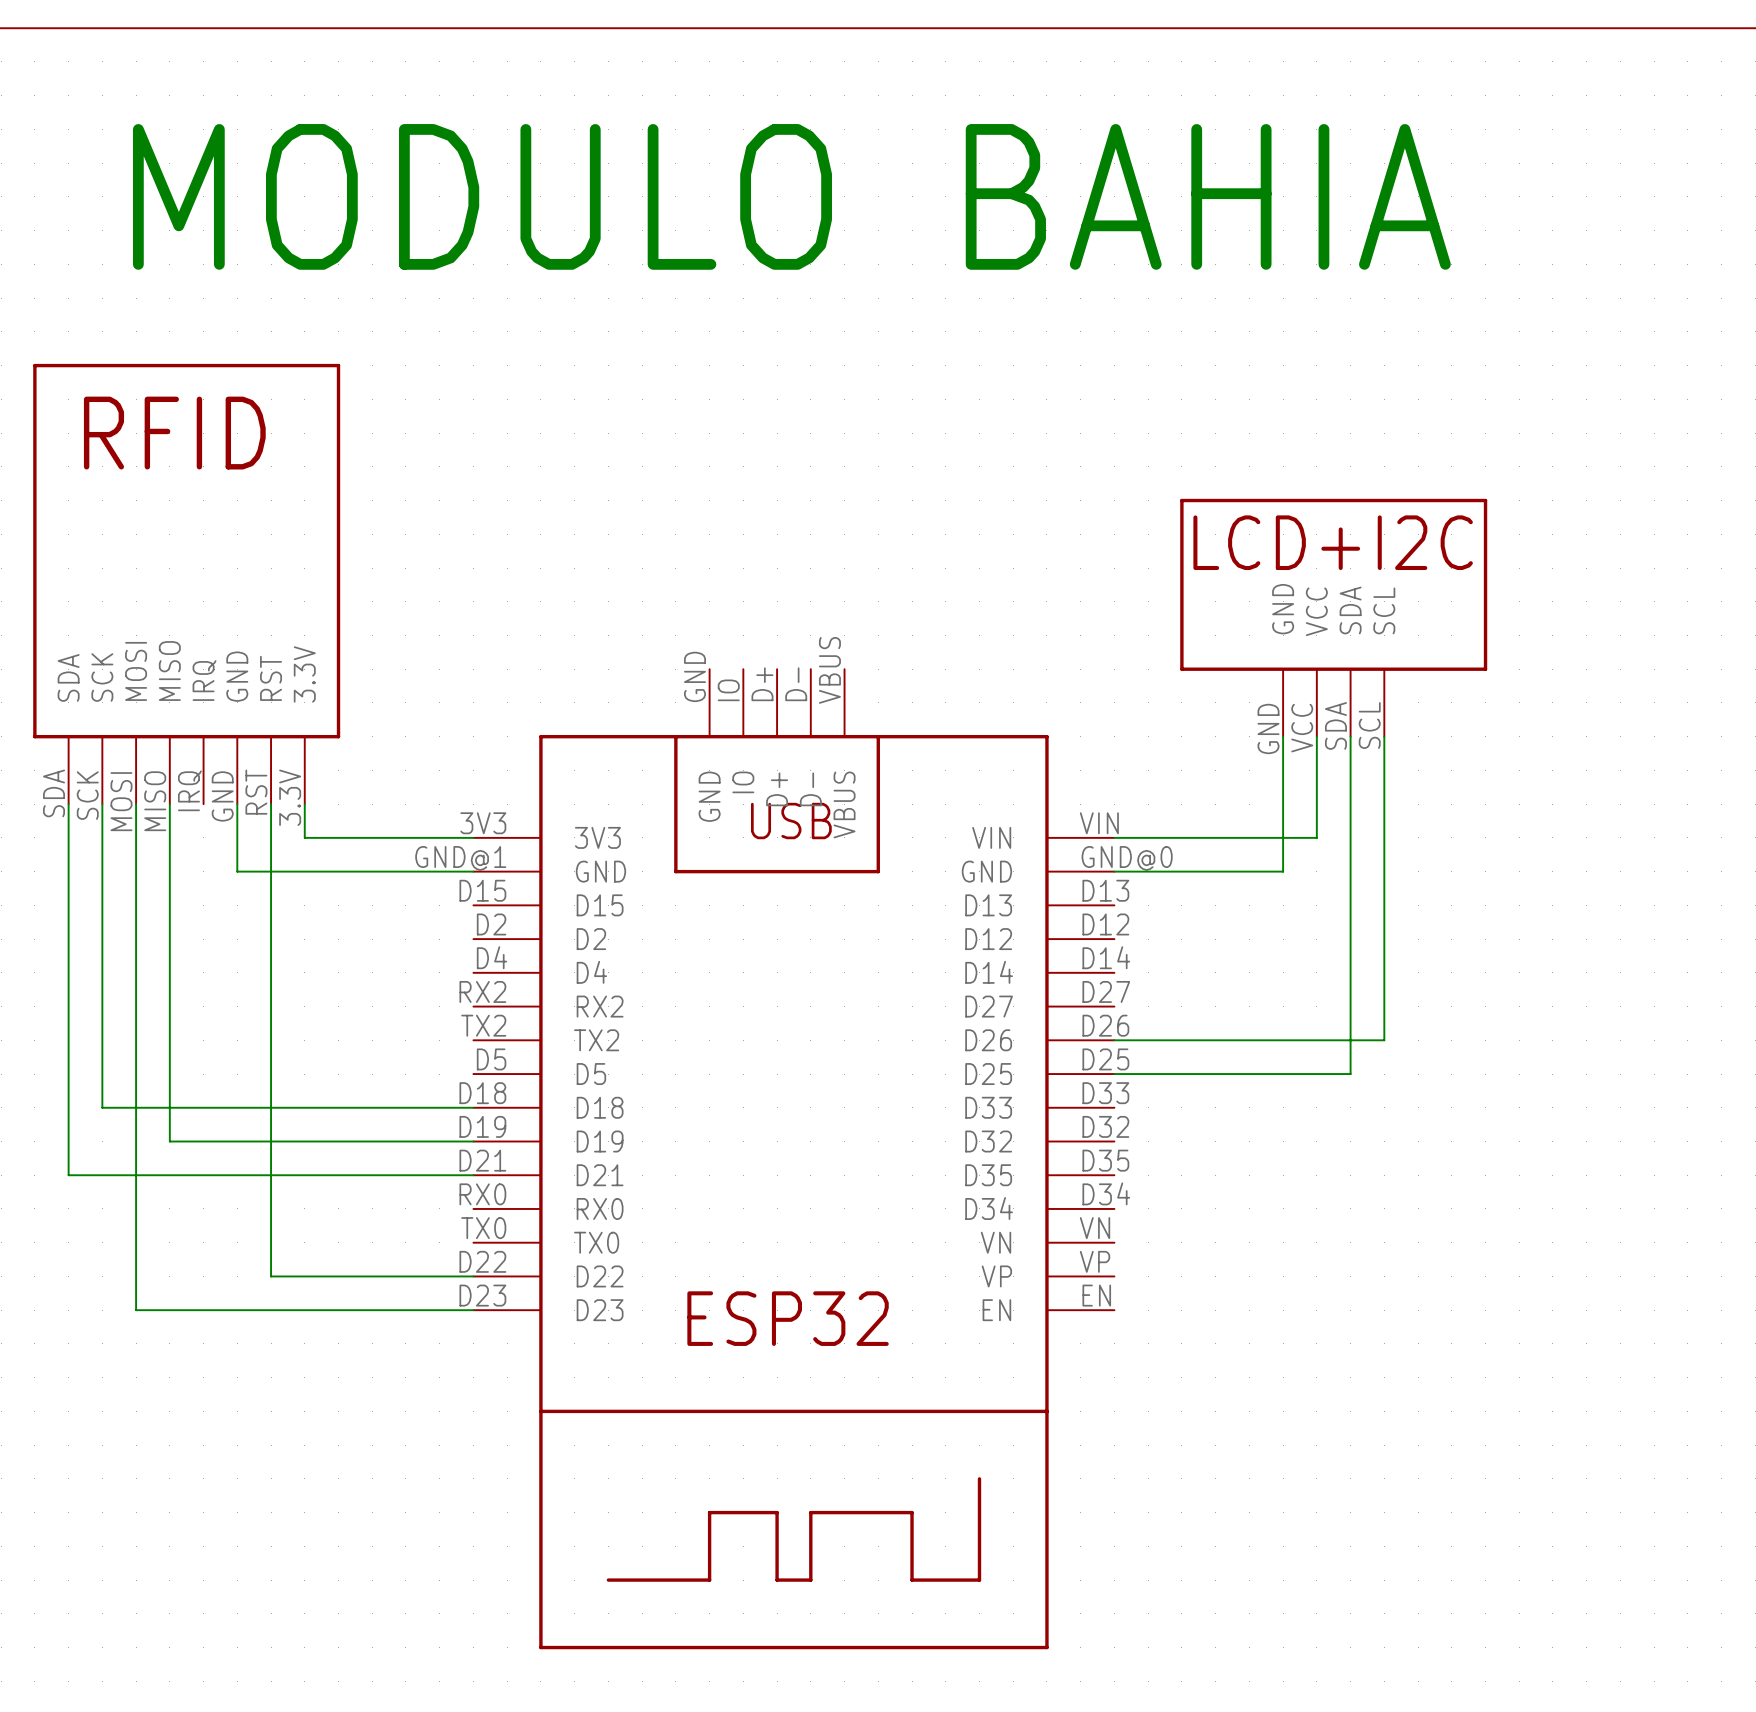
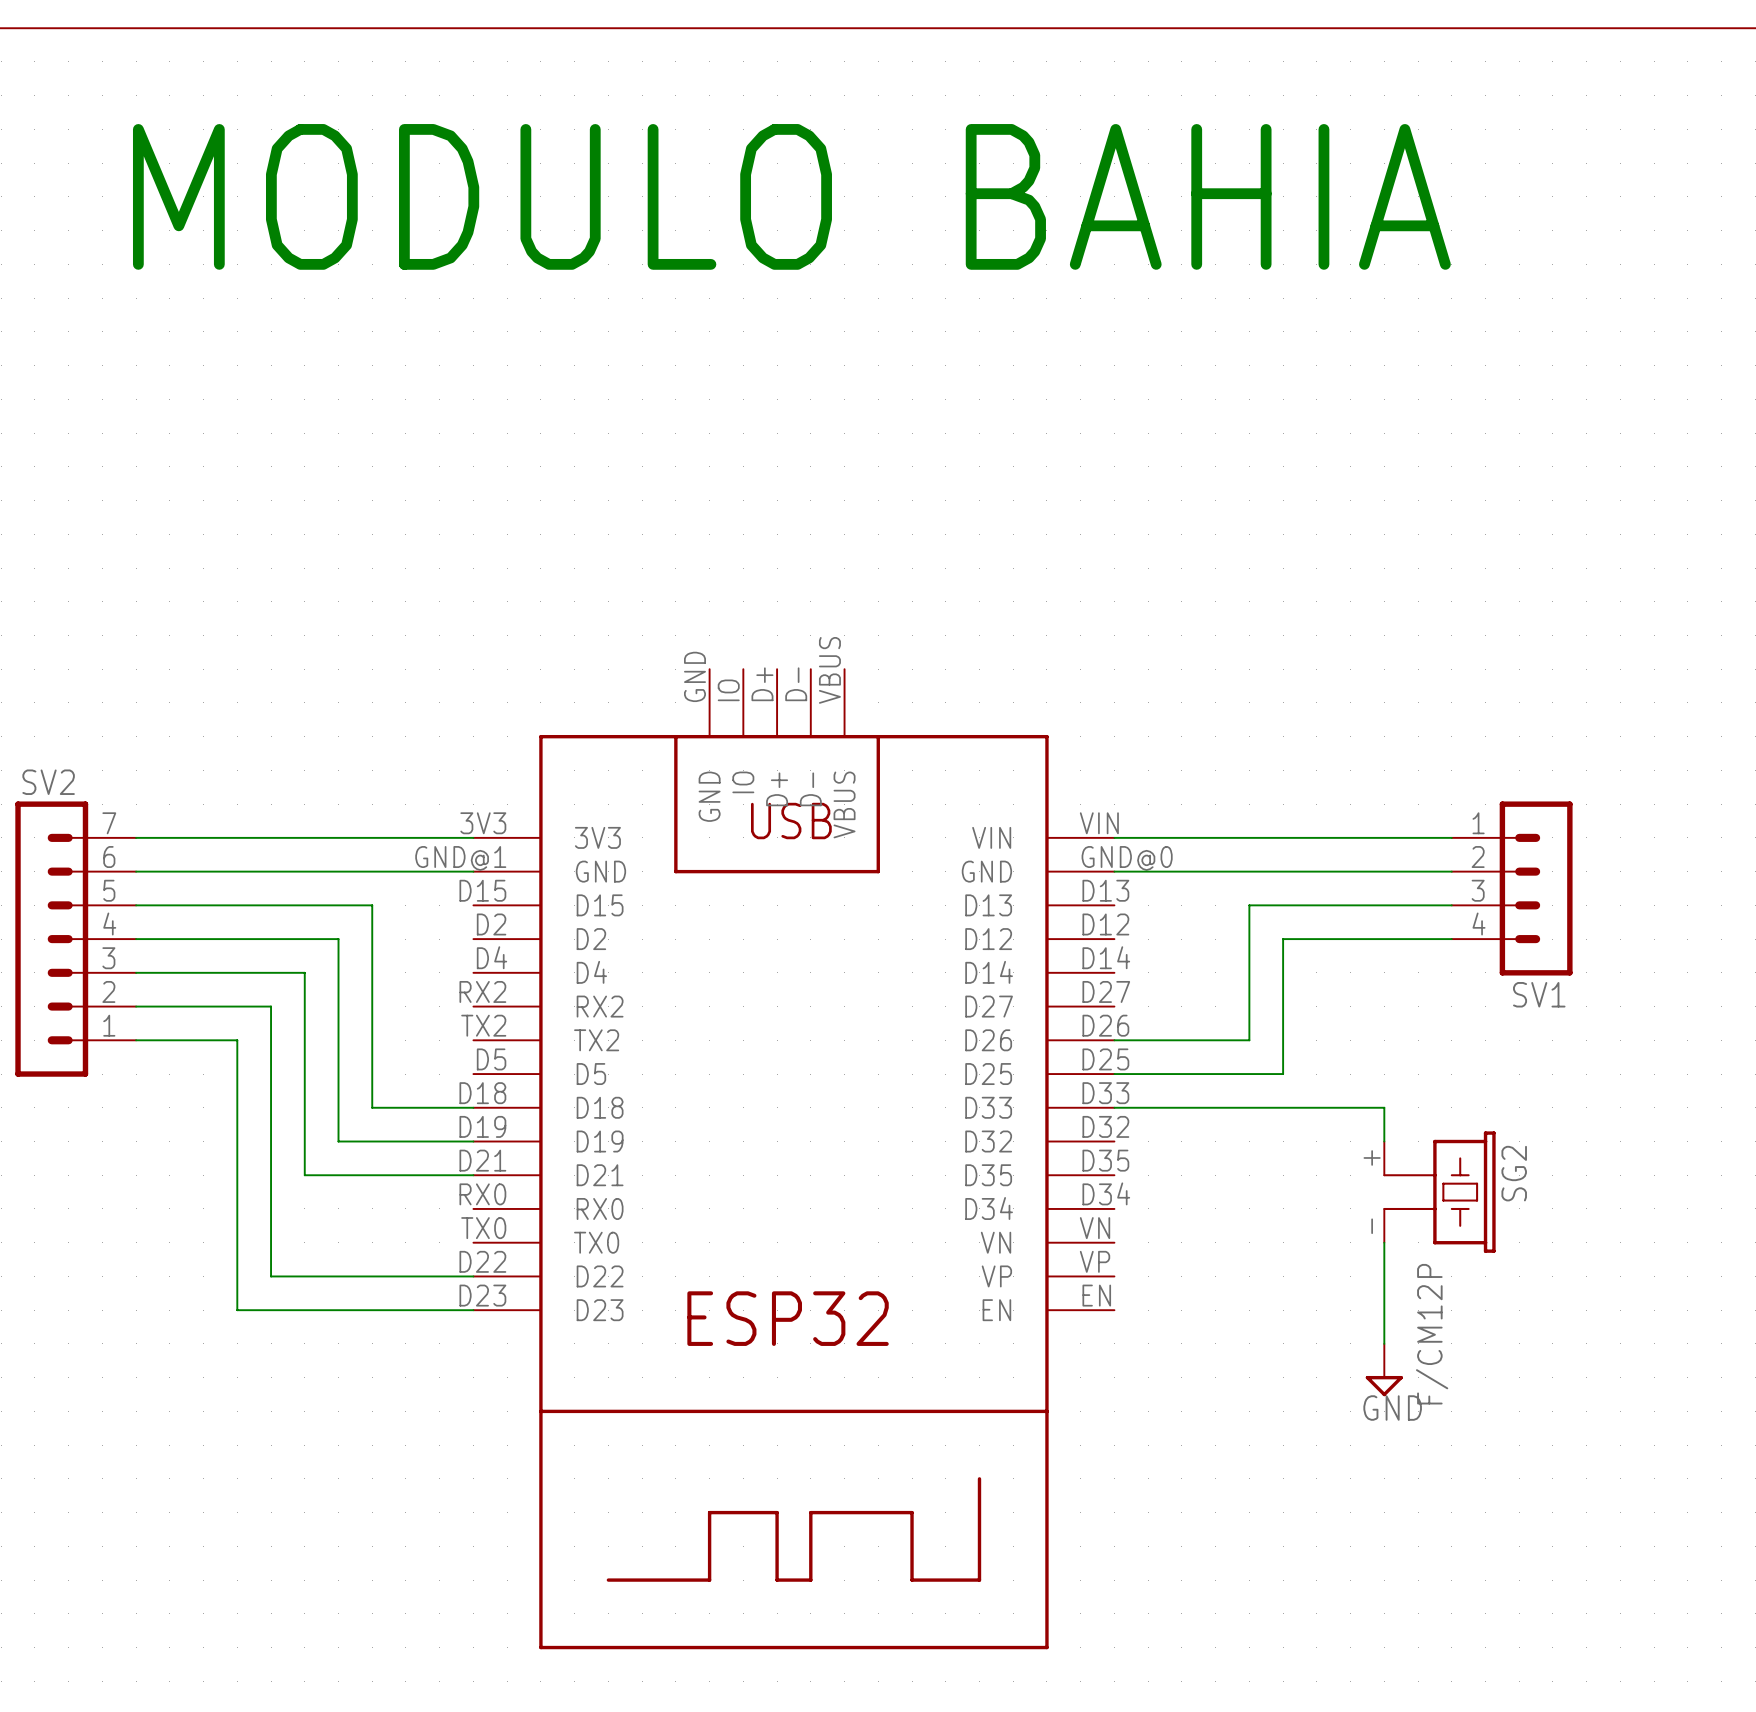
part: (186, 584) -> none
part: (1333, 617) -> none
wire: (1283, 736) (1283, 871) -> (1451, 871) (1283, 871)
wire: (1316, 736) (1316, 837) -> (1451, 837) (1316, 837)
wire: (1350, 736) (1350, 1074) (1283, 1074) -> (1451, 939) (1283, 939) (1283, 1074)
wire: (1384, 736) (1384, 1040) (1249, 1040) -> (1451, 905) (1249, 905) (1249, 1040)
wire: (68, 804) (68, 1175) (304, 1175) -> (136, 972) (304, 972) (304, 1175)
wire: (102, 804) (102, 1107) (372, 1107) -> (136, 905) (372, 905) (372, 1107)
wire: (136, 804) (136, 1310) (237, 1310) -> (136, 1040) (237, 1040) (237, 1310)
wire: (169, 804) (169, 1141) (338, 1141) -> (136, 939) (338, 939) (338, 1141)
wire: (237, 804) (237, 871) -> (136, 871) (237, 871)
wire: (271, 804) (271, 1006) -> (136, 1006) (271, 1006)
wire: (304, 804) (304, 837) -> (136, 837) (304, 837)
SV1: none -> (1512, 888)
SV2: none -> (75, 939)
wire: none -> (1114, 1107) (1384, 1107) (1384, 1141)
SG2: none -> F/CM12P (1439, 1192)
wire: none -> (1384, 1242) (1384, 1343)
power symbol: none -> GND (1384, 1370)

